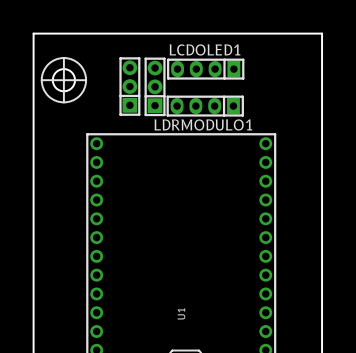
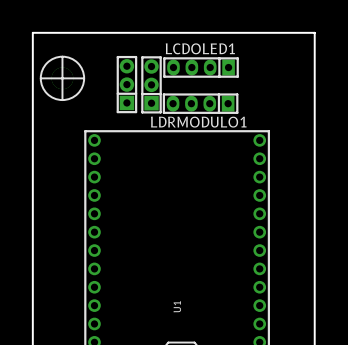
part footprint: [40, 57, 88, 104] -> [39, 55, 86, 101]

